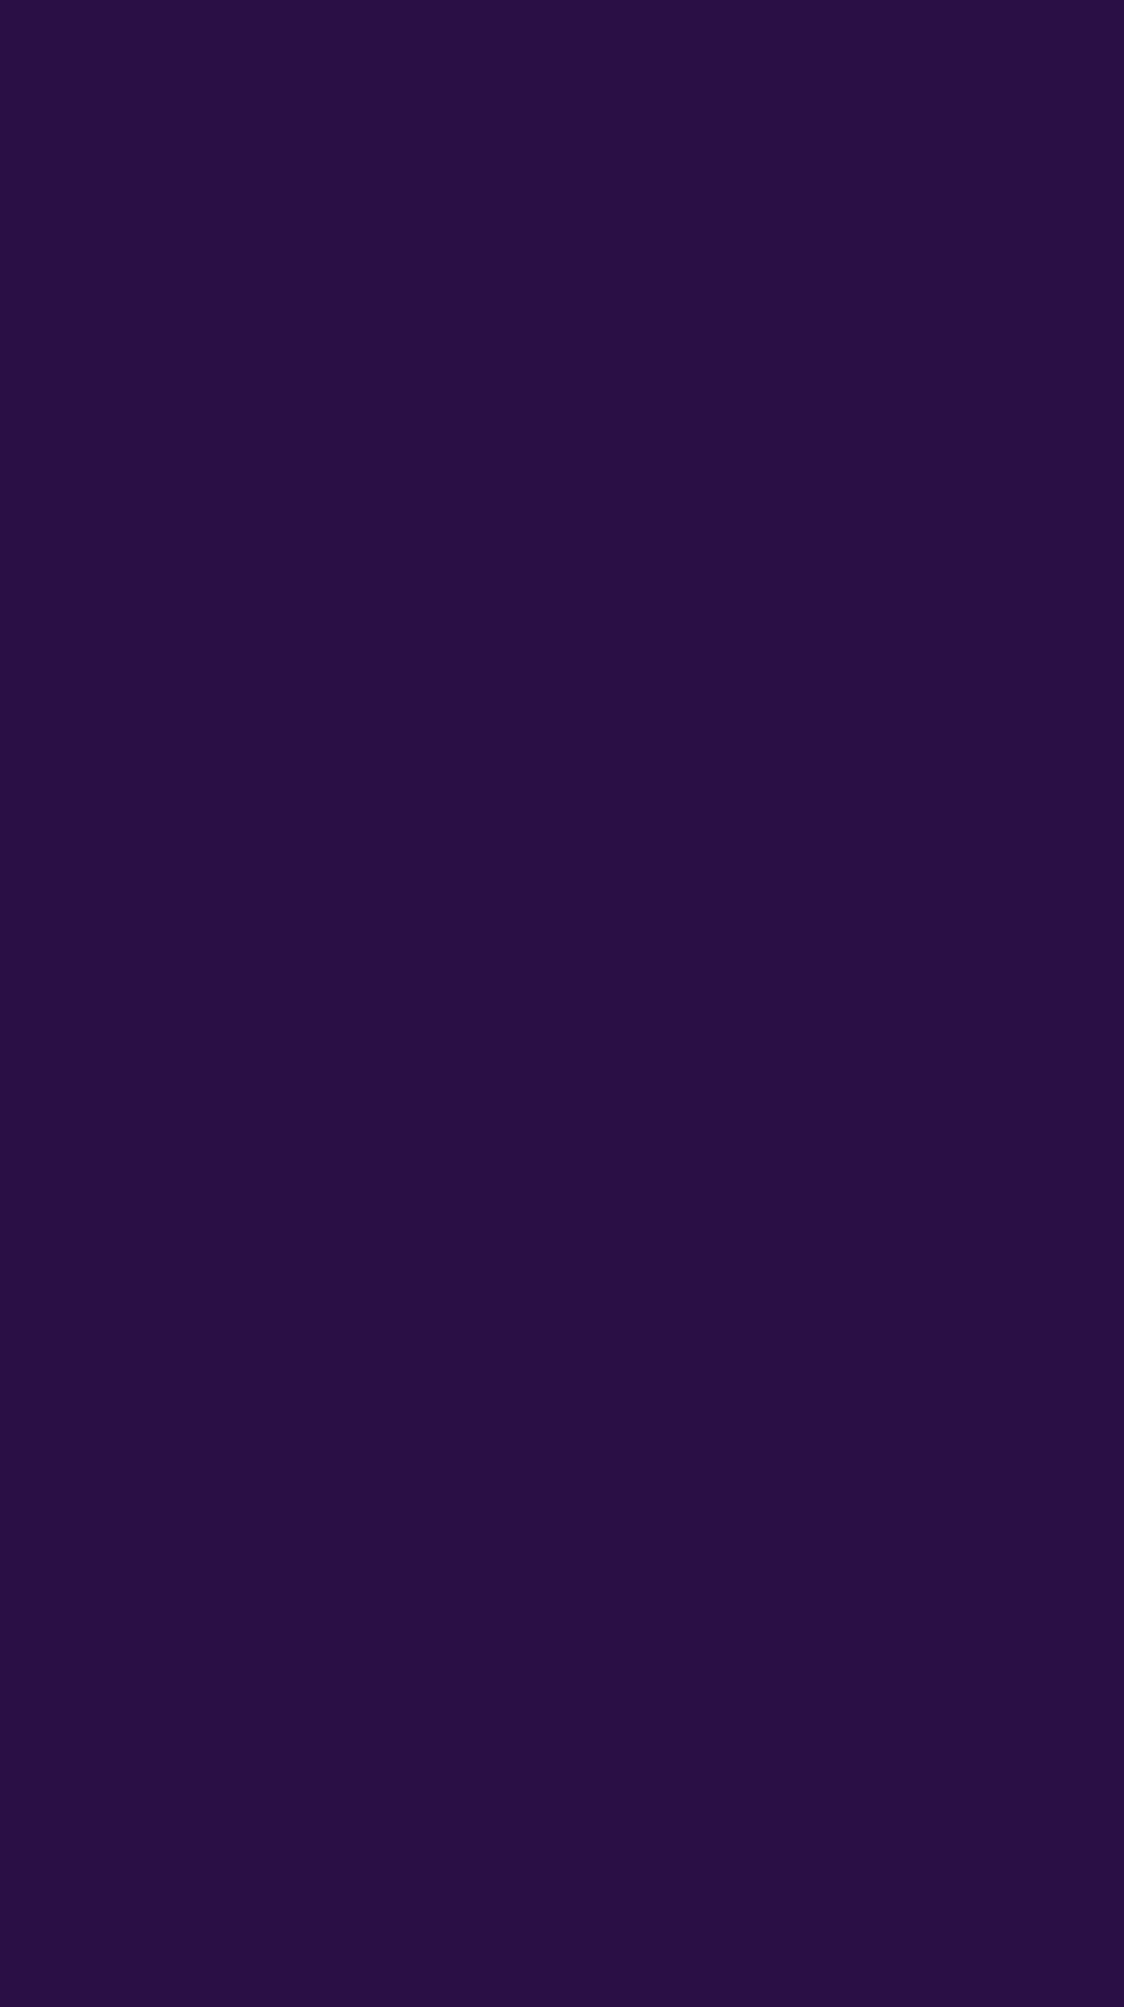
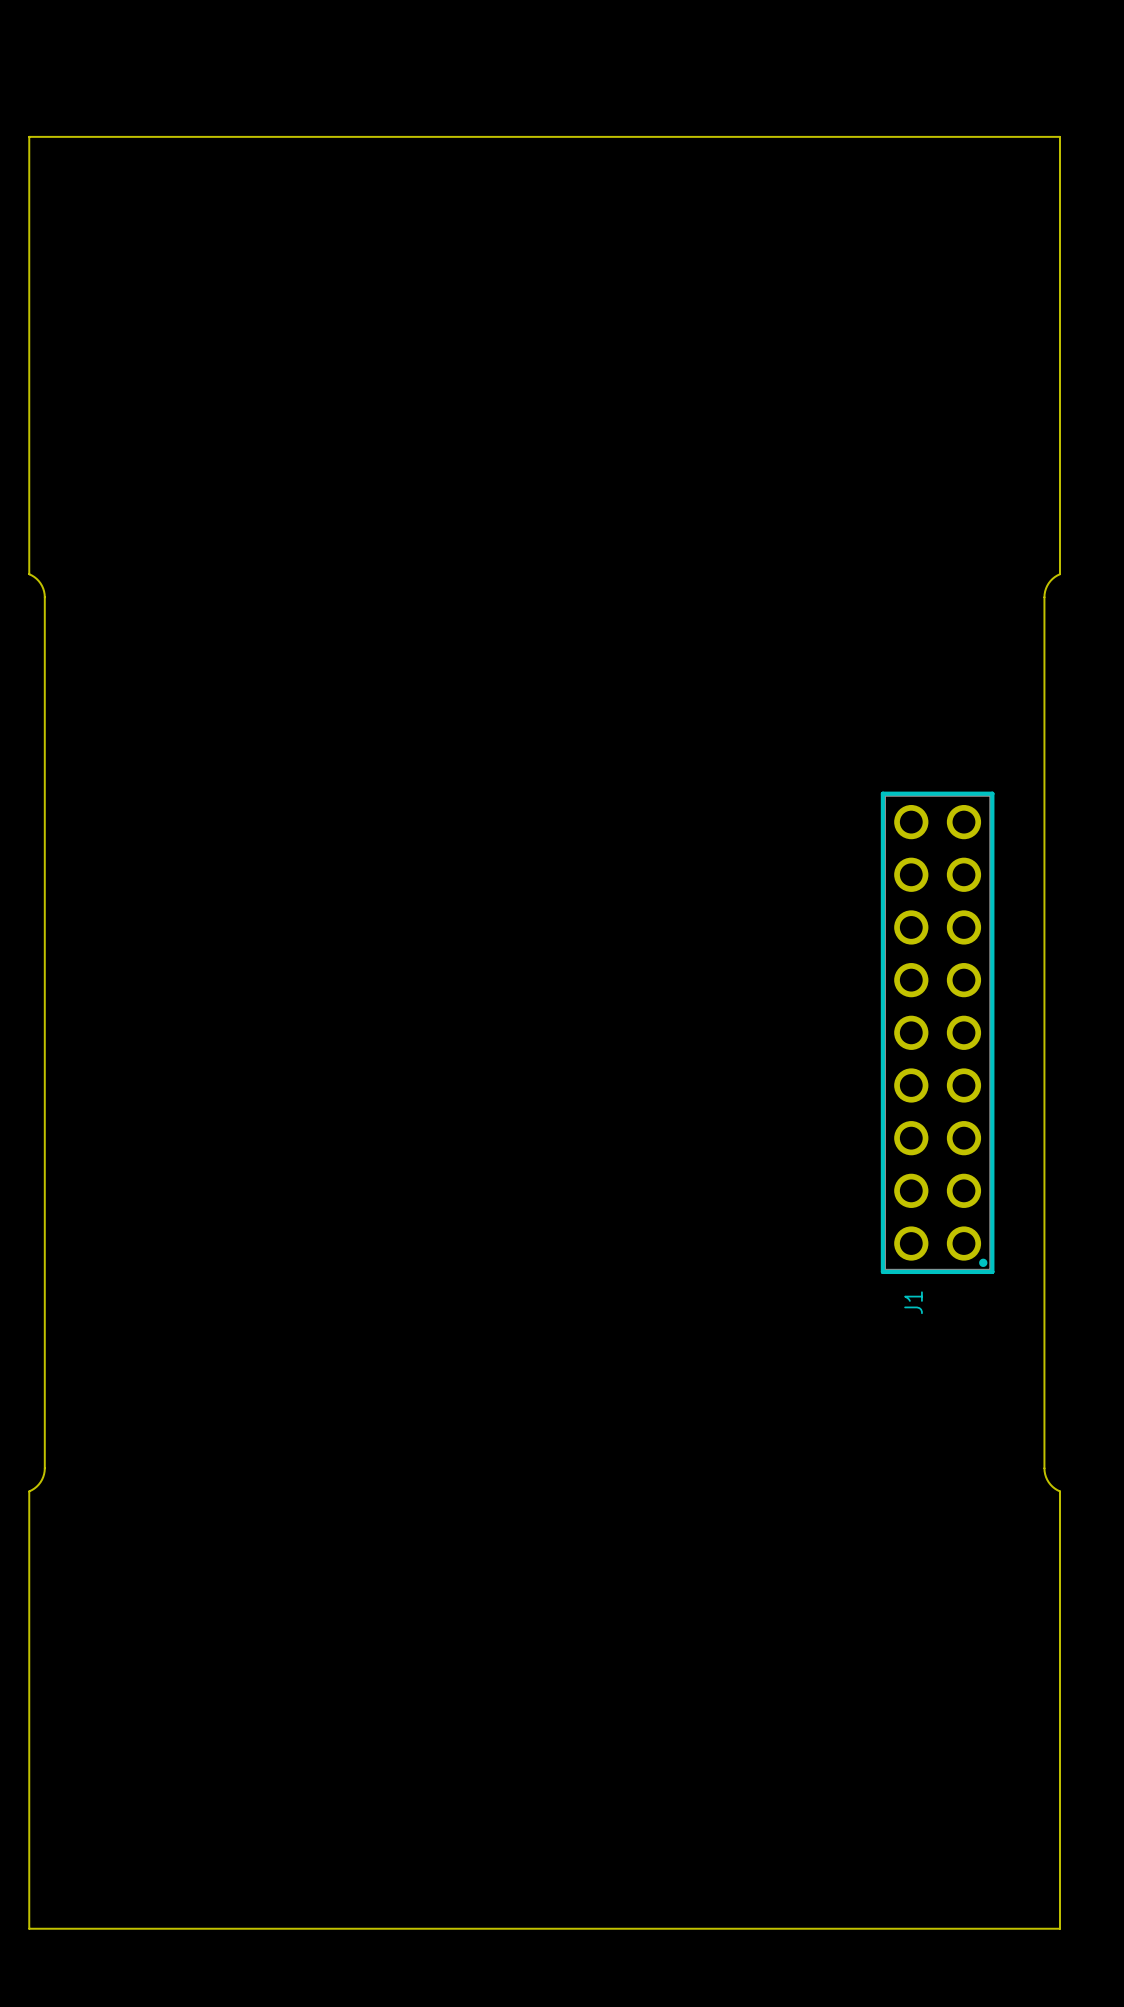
board edge: none -> (29, 136) (29, 574) (40, 583) (44, 597) (44, 1468) (40, 1482) (29, 1491) (29, 1928) (1059, 1928) (1059, 1491) (1048, 1482) (1044, 1468) (1044, 597) (1048, 583) (1059, 574) (1059, 136) (29, 136)
J1: none -> (937, 1032)

